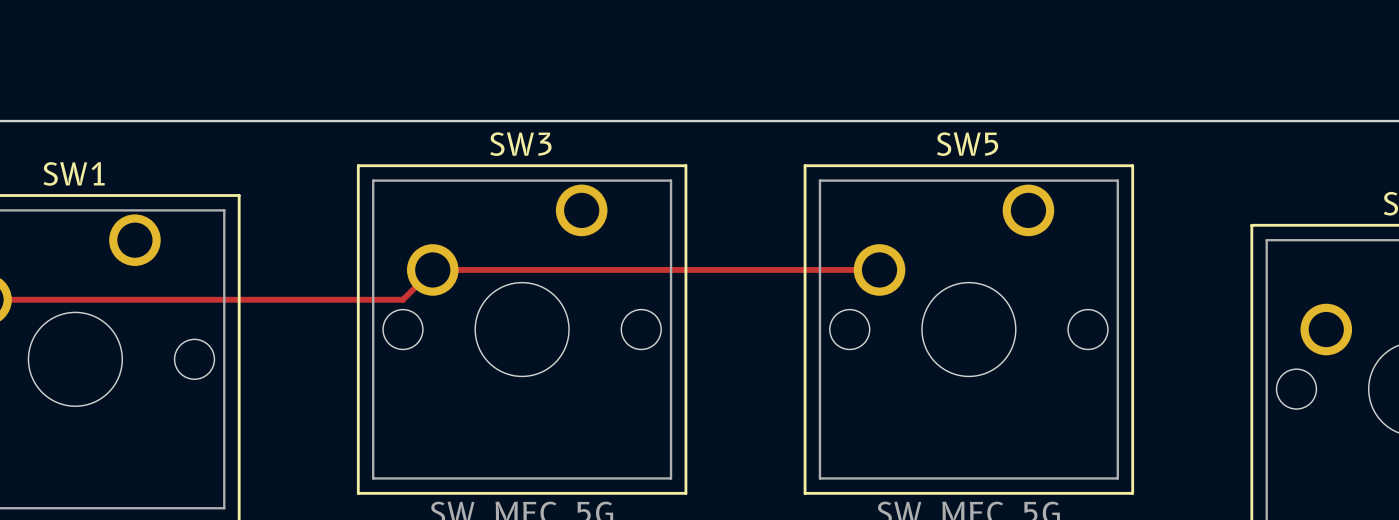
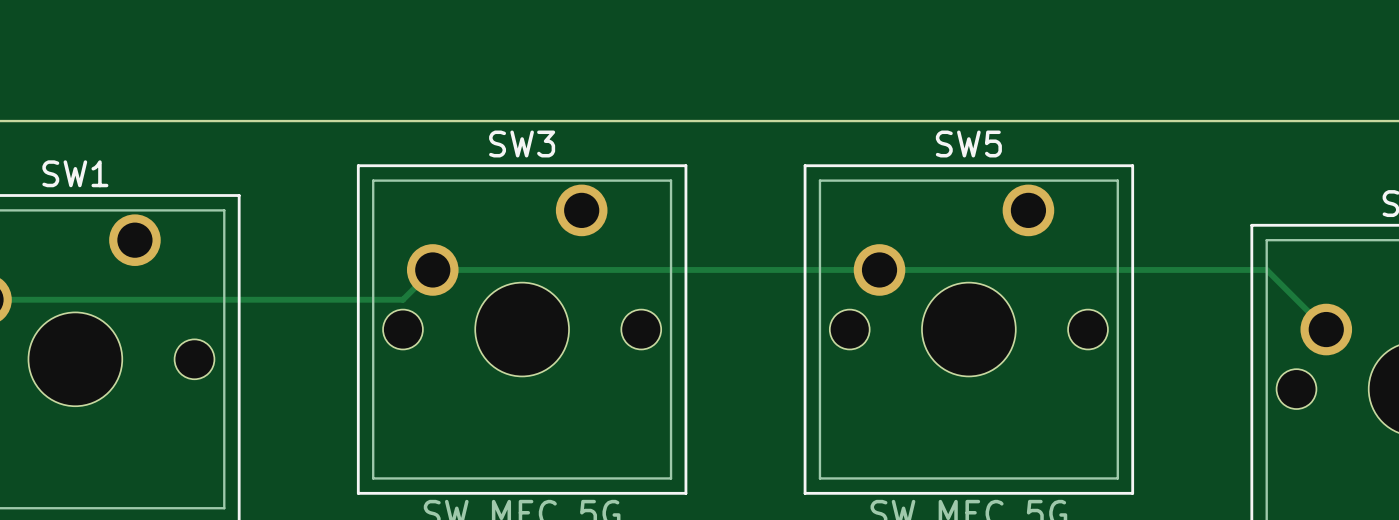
track: none -> (879, 269) (1266, 269) (1326, 329)

